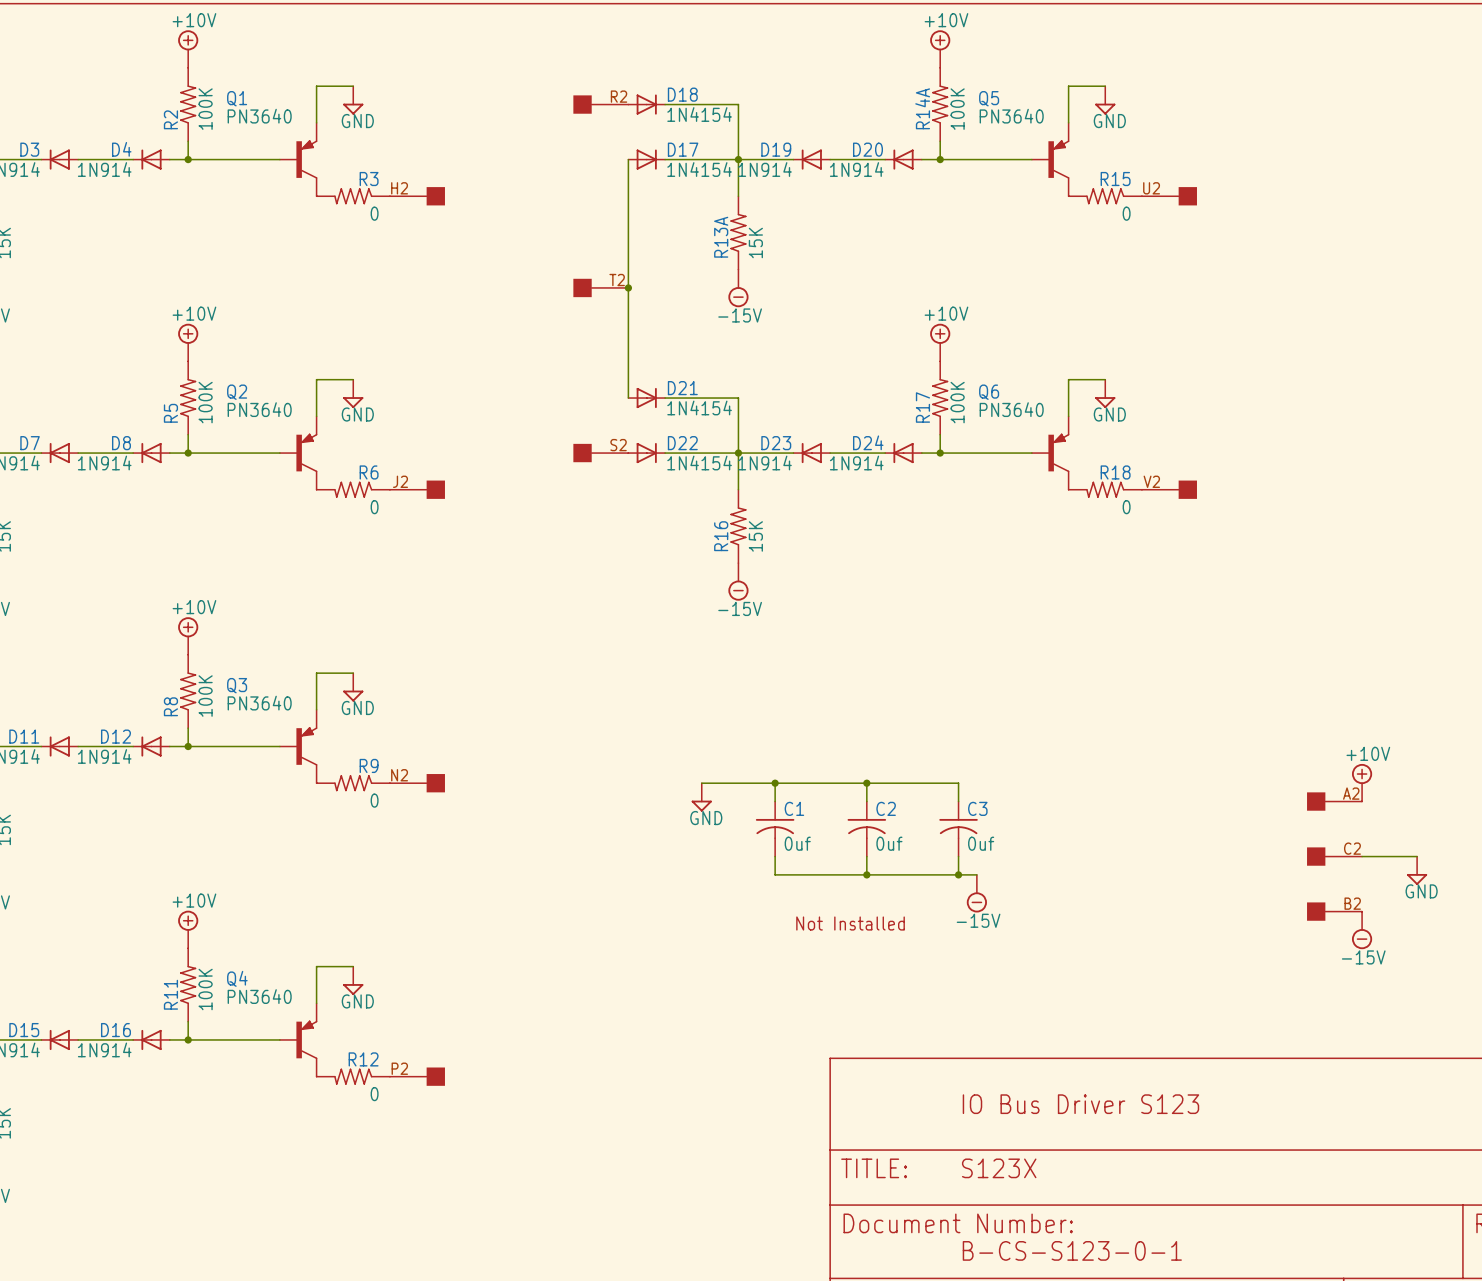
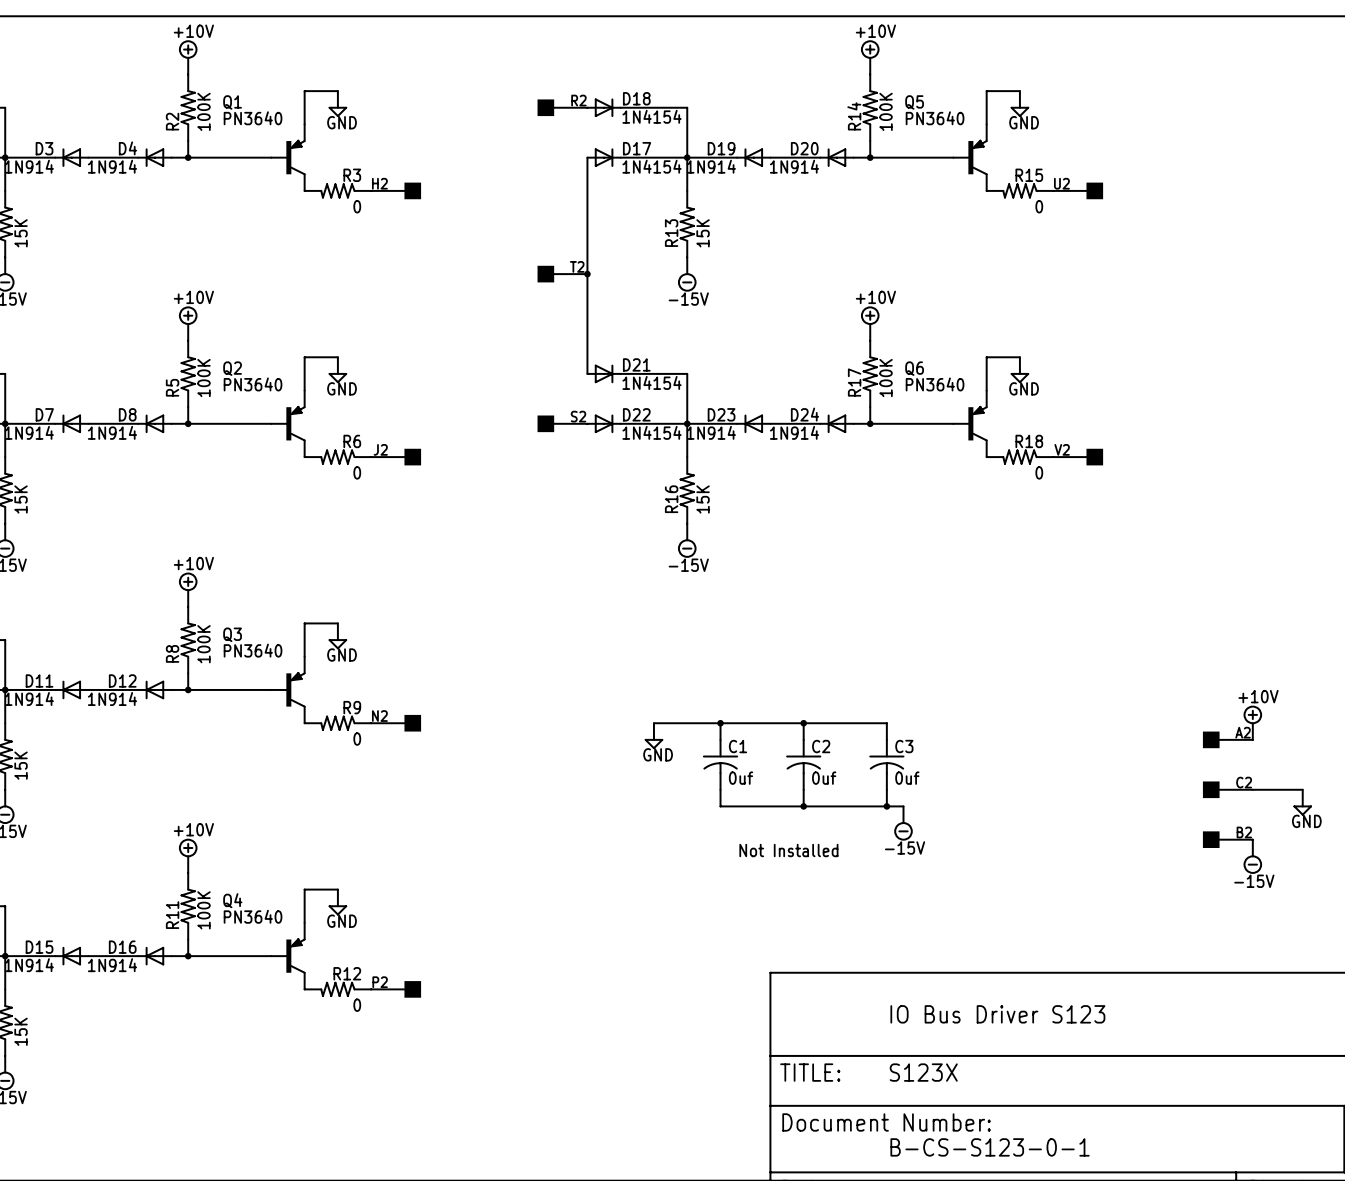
R14A name: R14A (922, 108) -> R14 (854, 116)
R13A name: R13A (721, 237) -> R13 (671, 233)

